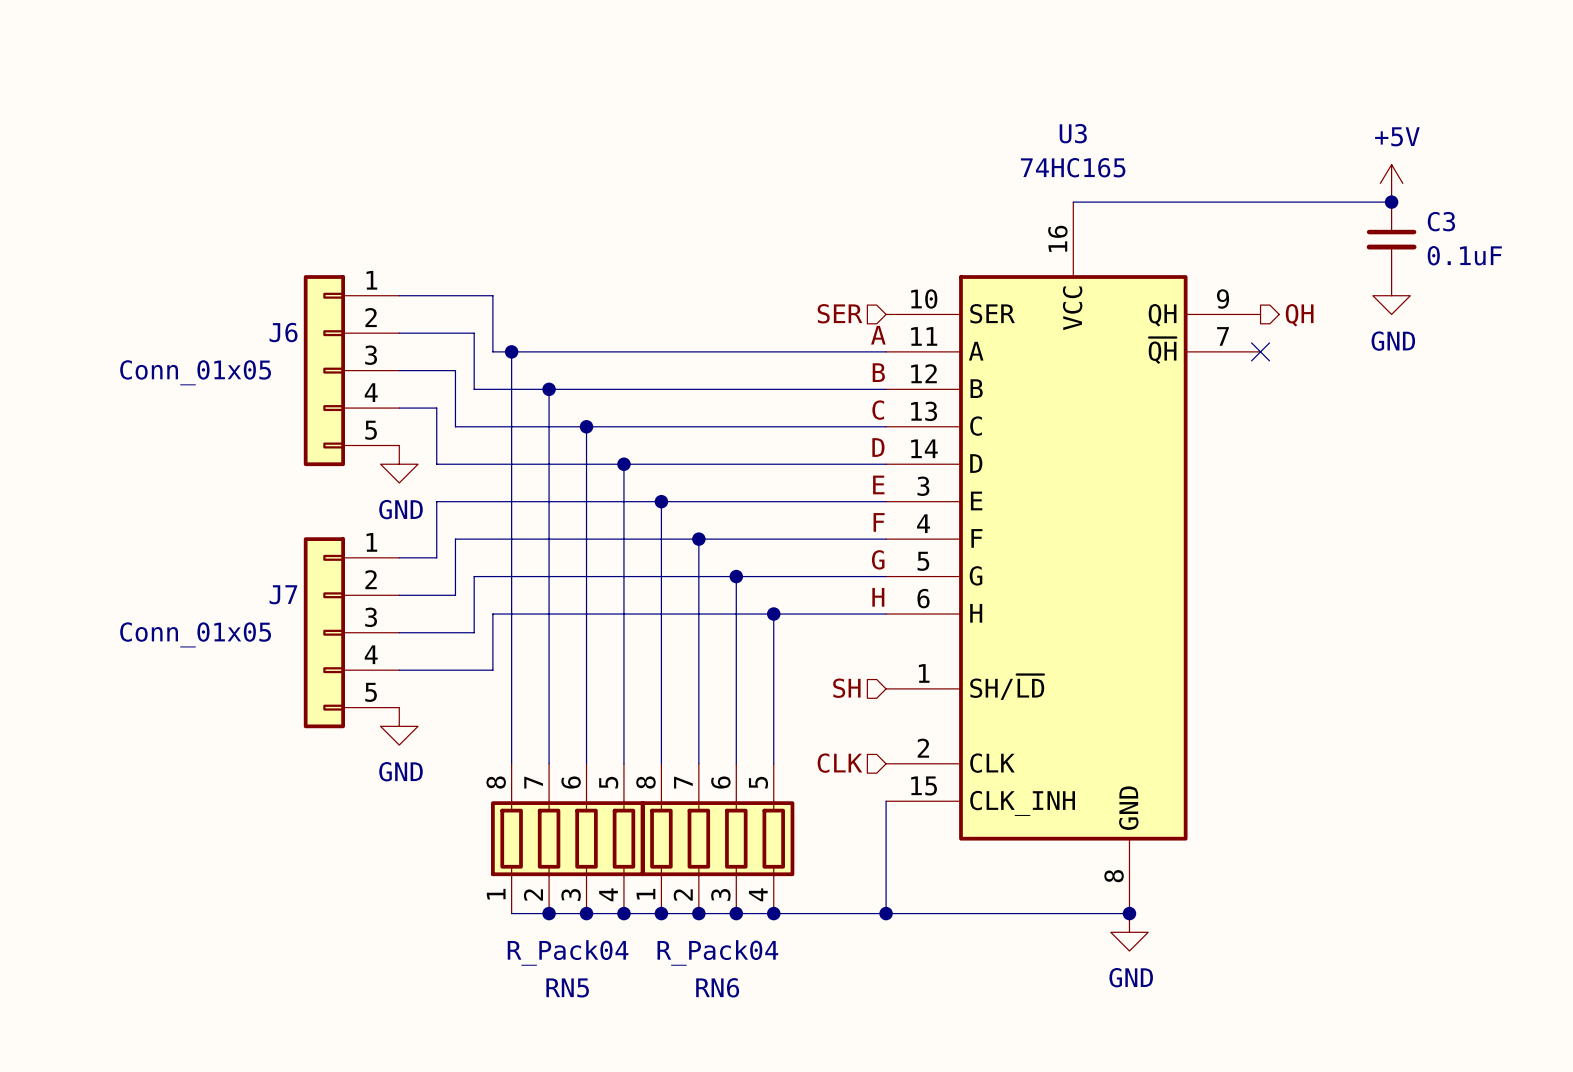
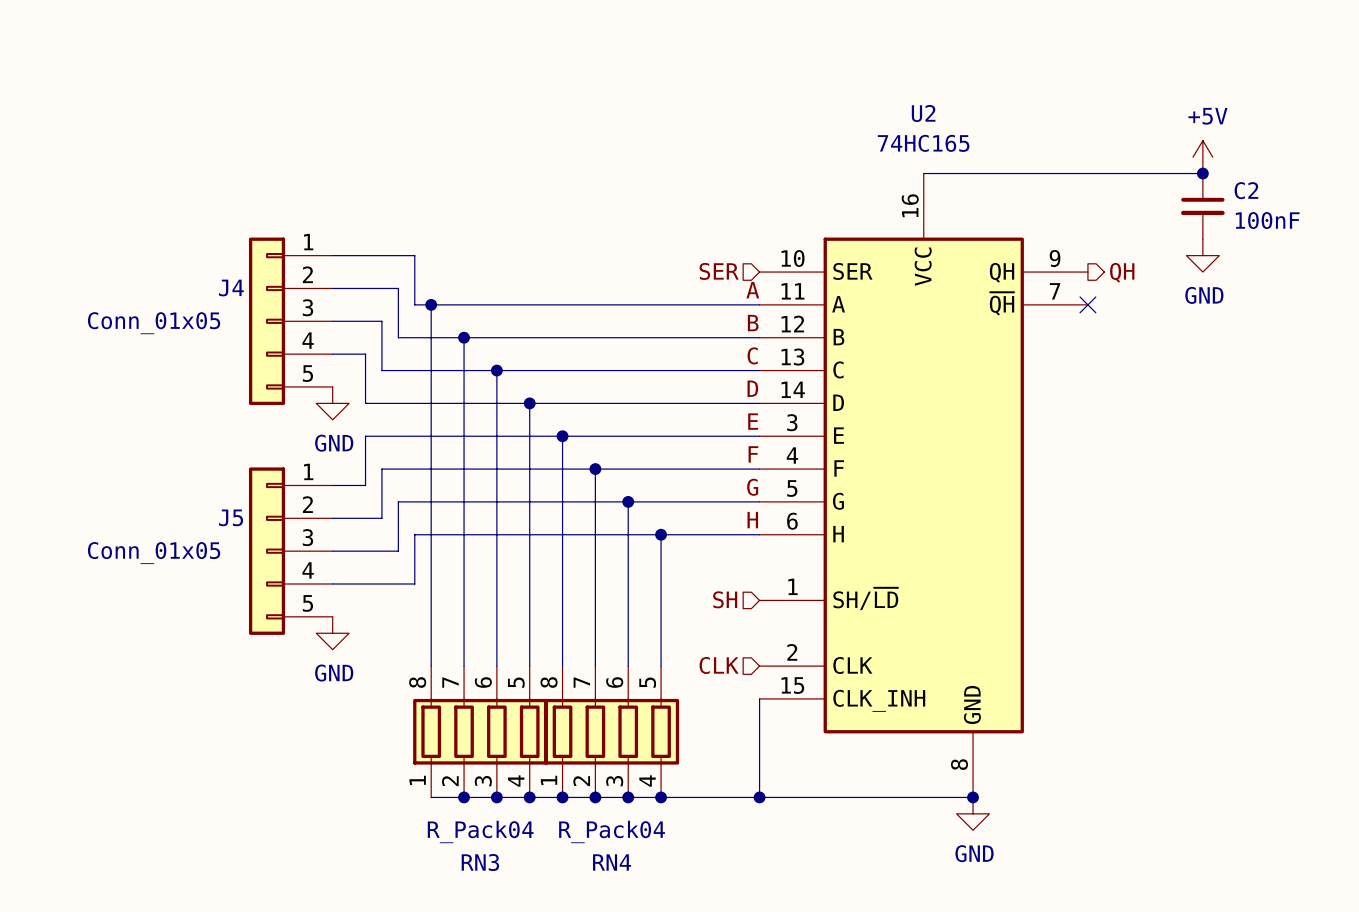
U3 name: U3 (1073, 133) -> U2 (923, 113)
C3 name: C3 (1441, 221) -> C2 (1246, 190)
C3 value: 0.1uF (1464, 255) -> 100nF (1267, 220)
J6 name: J6 (283, 332) -> J4 (231, 288)
J7 name: J7 (283, 594) -> J5 (231, 517)
RN5 name: RN5 (567, 987) -> RN3 (480, 862)
RN6 name: RN6 (717, 987) -> RN4 (612, 862)

